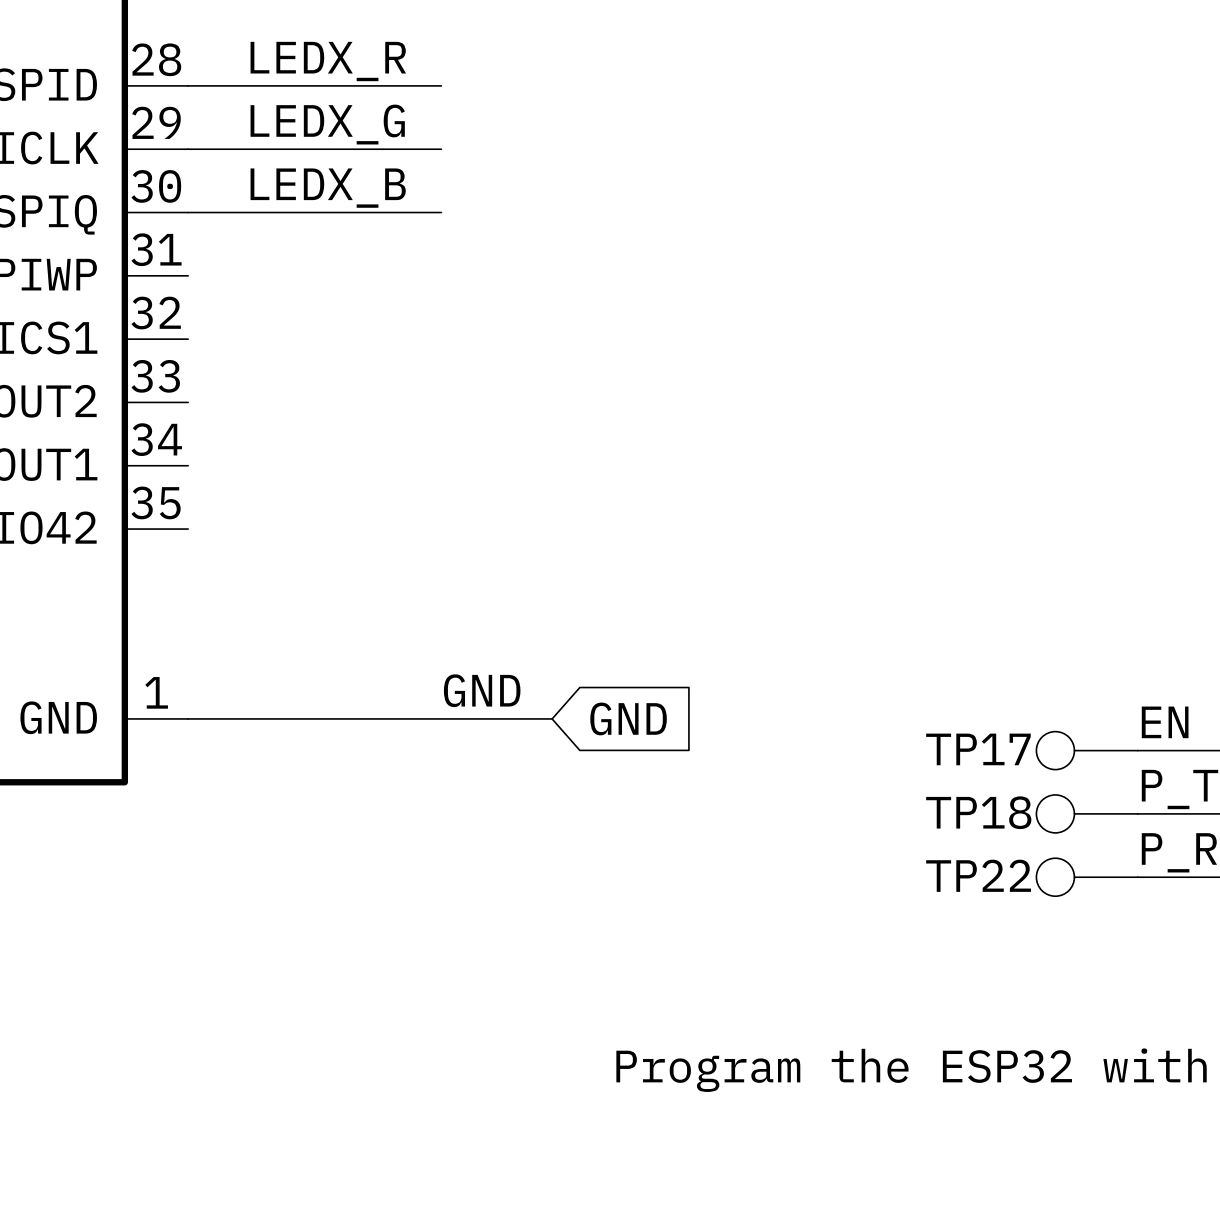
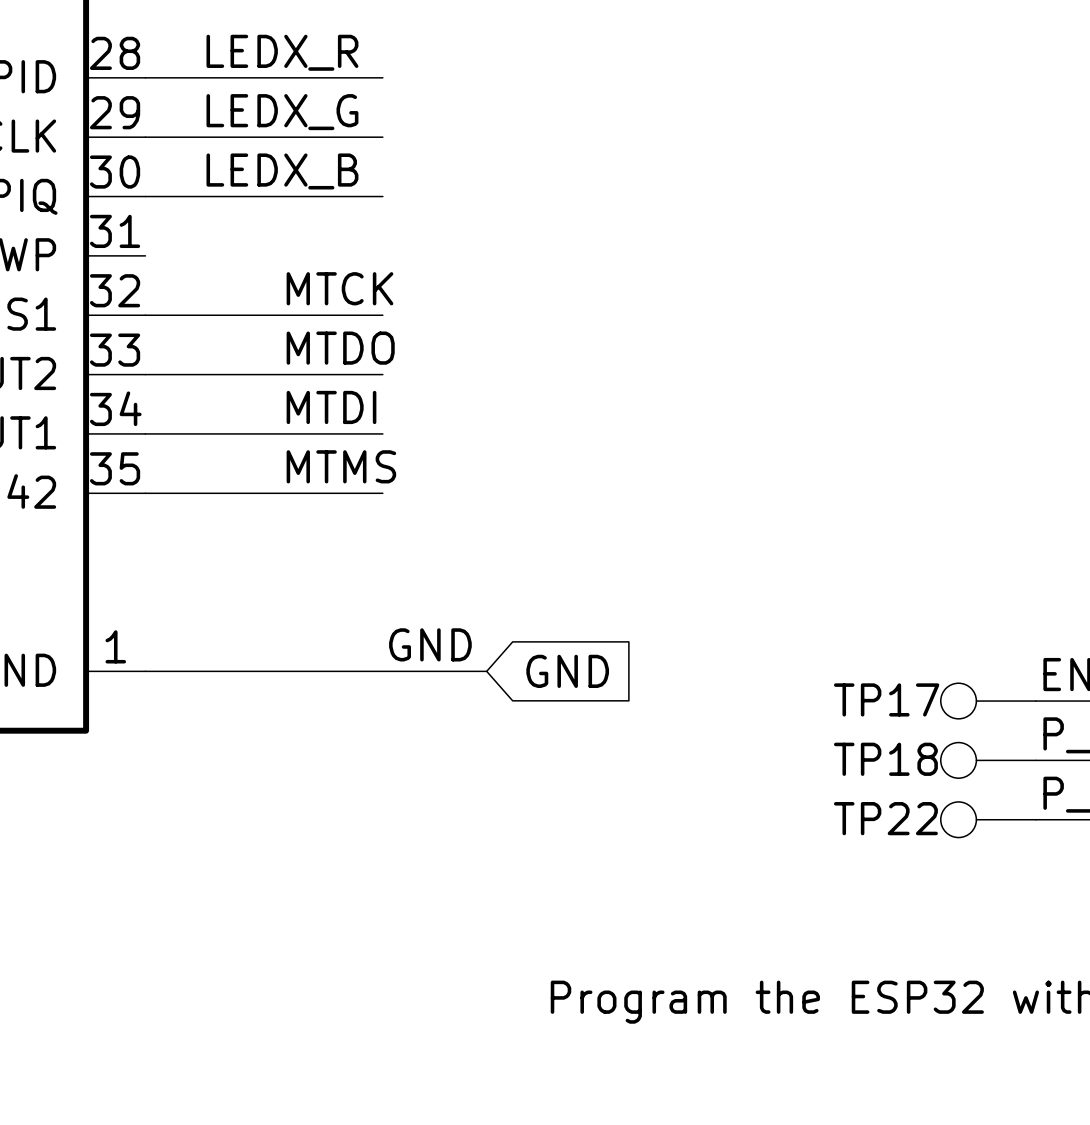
label: none -> MTCK (339, 288)
wire: none -> (145, 315) (382, 315)
label: none -> MTDO (340, 348)
wire: none -> (145, 374) (382, 374)
label: none -> MTDI (331, 407)
wire: none -> (145, 433) (382, 433)
label: none -> MTMS (341, 466)
wire: none -> (145, 493) (382, 493)

